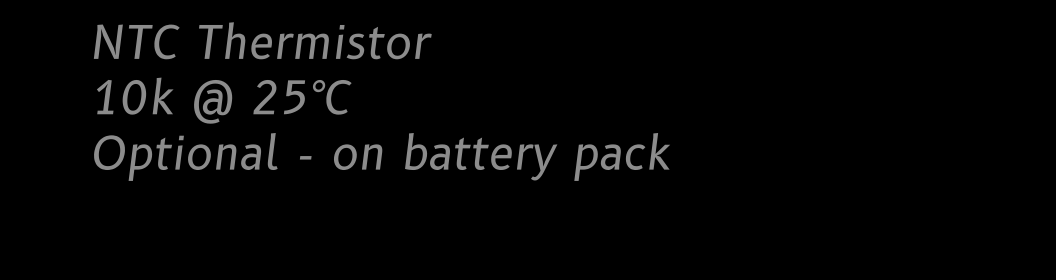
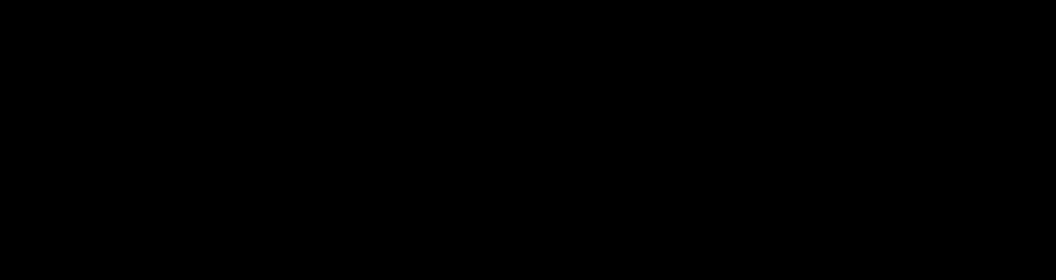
text: NTC Thermistor (262, 40) -> none
text: 10k @ 25°C (224, 100) -> none
text: Optional - on battery pack (381, 156) -> none

